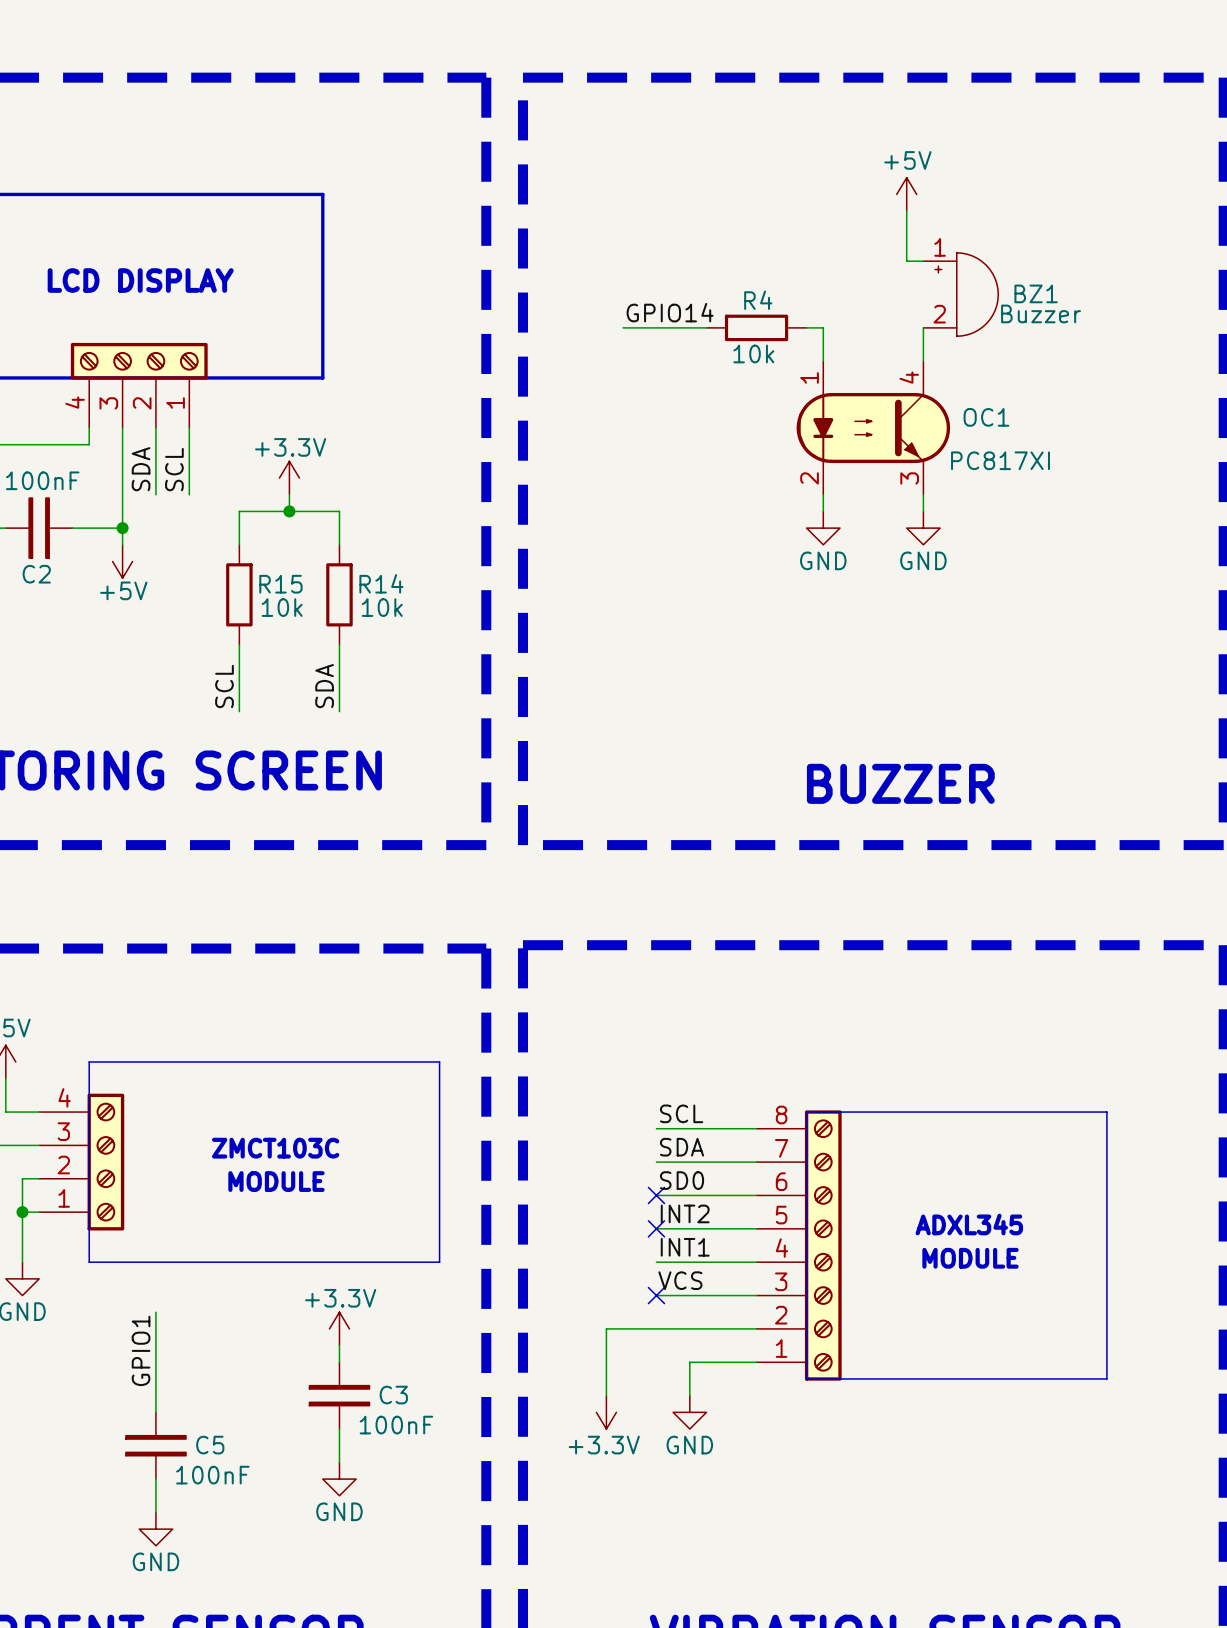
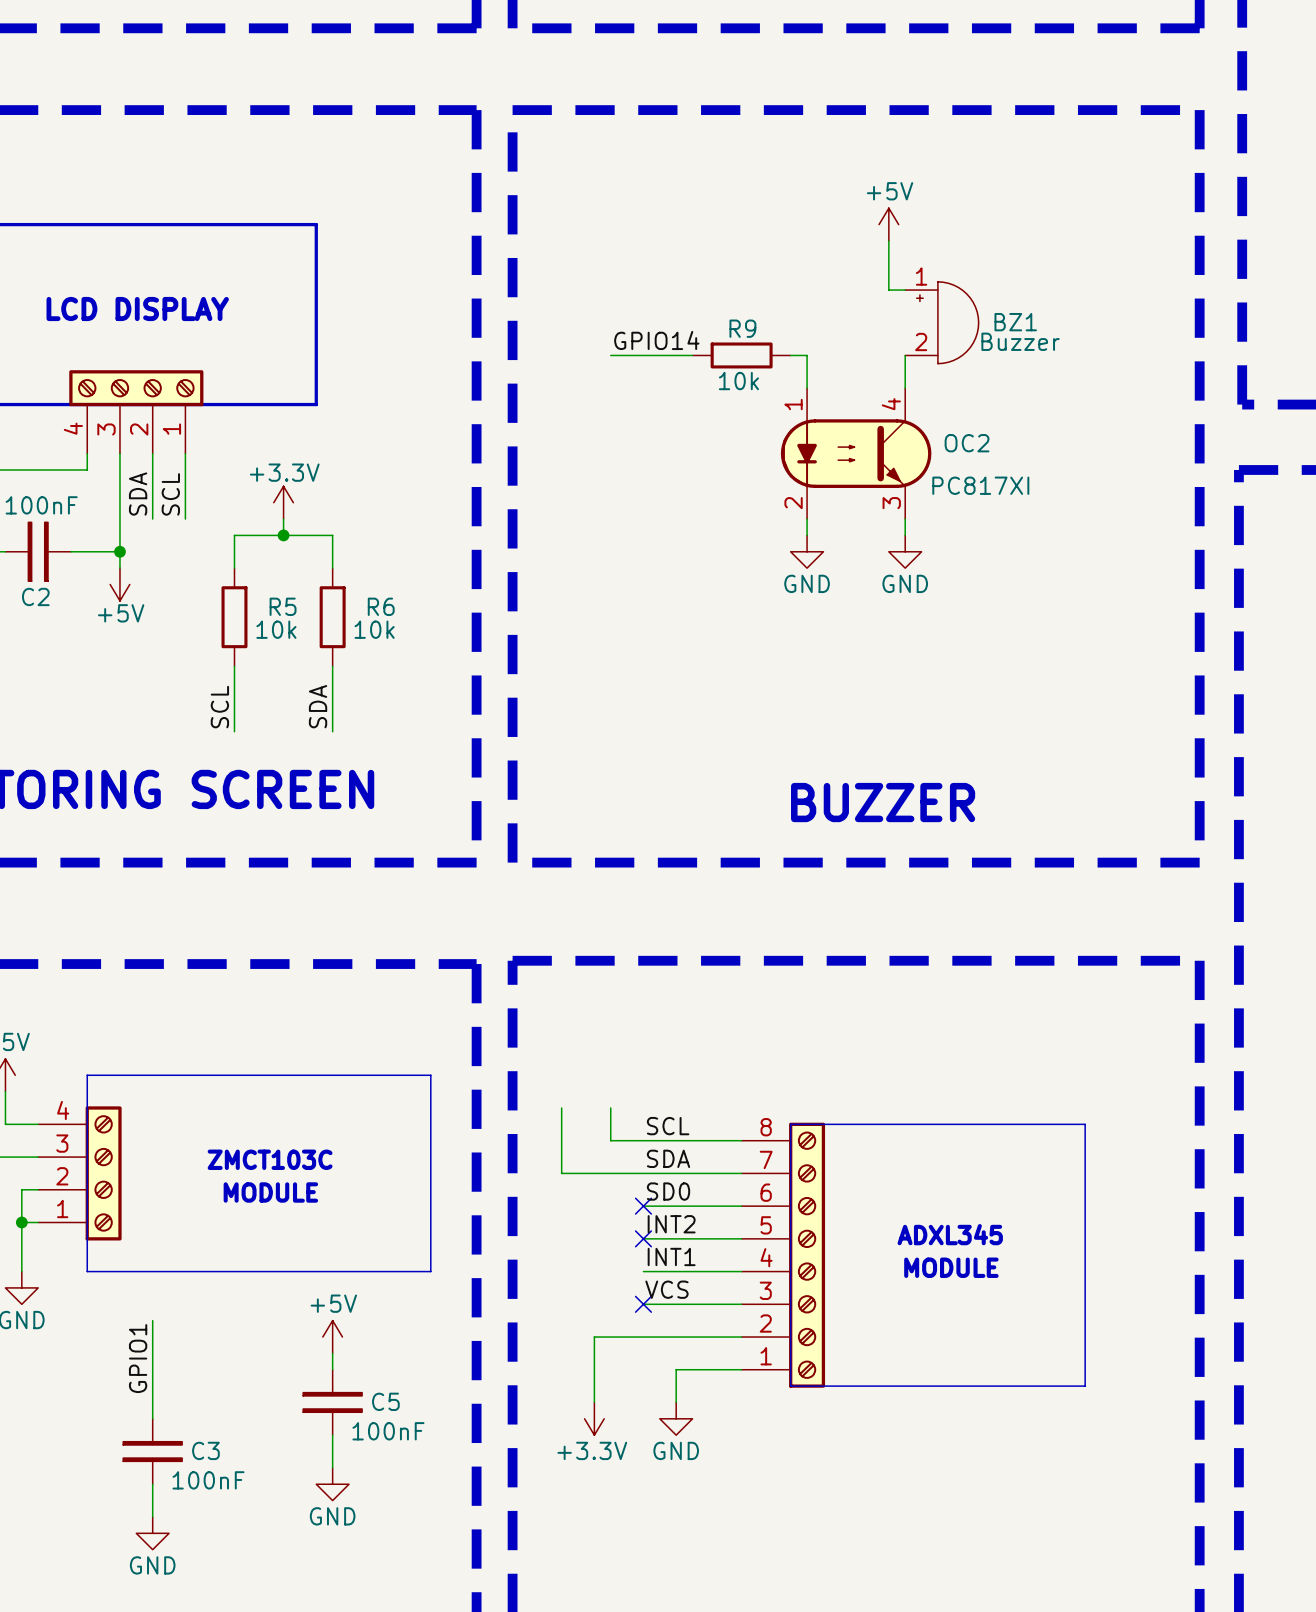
R4 name: R4 (758, 300) -> R9 (742, 328)
OC1 name: OC1 (986, 417) -> OC2 (967, 443)
R14 name: R14 (381, 583) -> R6 (381, 606)
R15 name: R15 (280, 584) -> R5 (283, 606)
wire: none -> (561, 1107) (561, 1173) (643, 1173)
wire: none -> (610, 1107) (610, 1140) (643, 1140)
power symbol: +3.3V (339, 1328) -> +5V (332, 1337)
C3 name: C3 (393, 1395) -> C5 (385, 1401)
C5 name: C5 (210, 1445) -> C3 (205, 1450)

